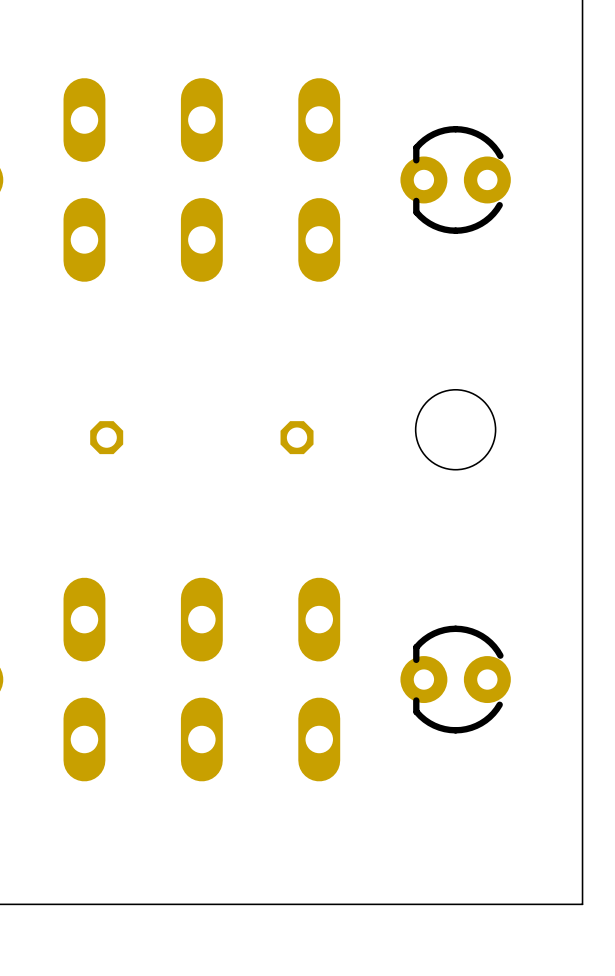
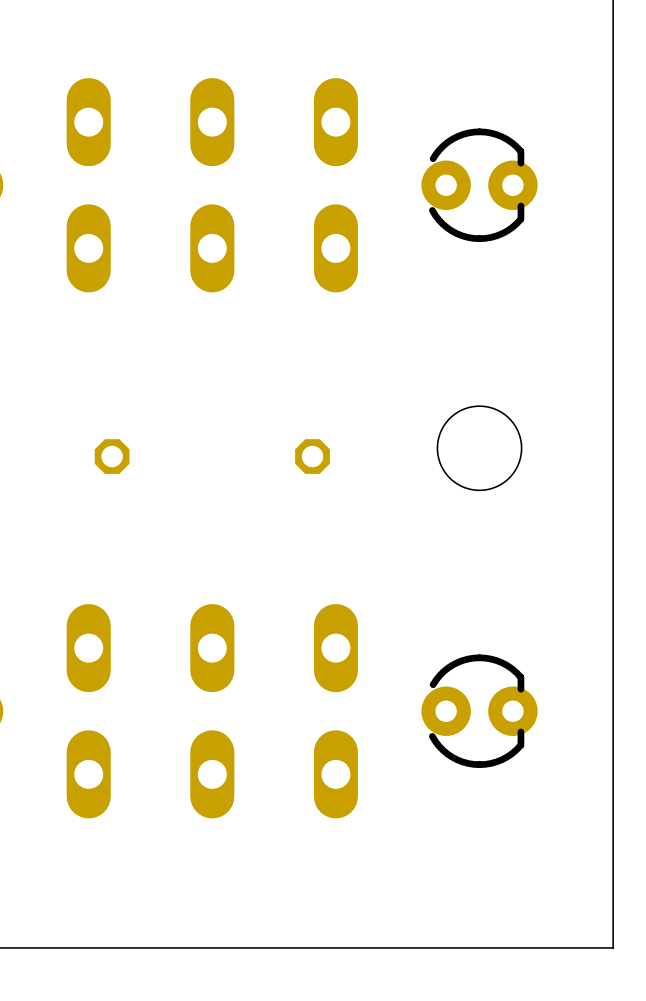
part rotation: 0° (455, 179) -> 180° (479, 185)
part rotation: 0° (455, 679) -> 180° (479, 711)

